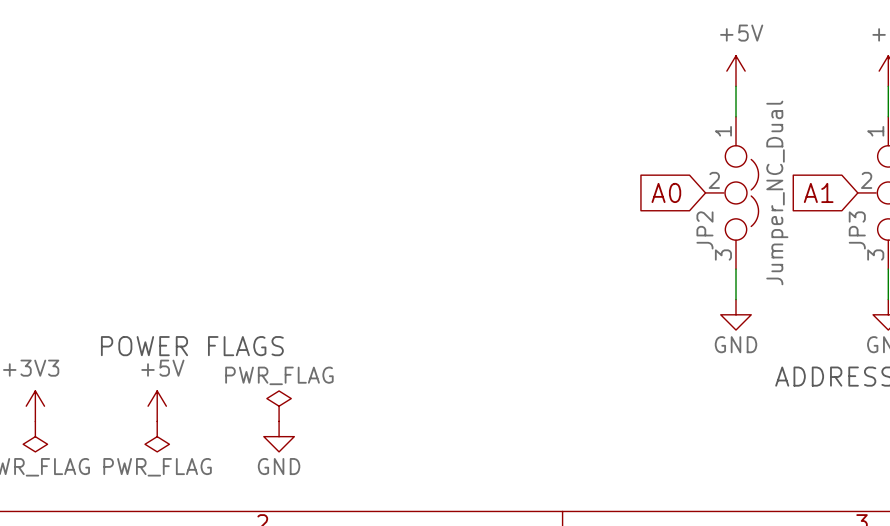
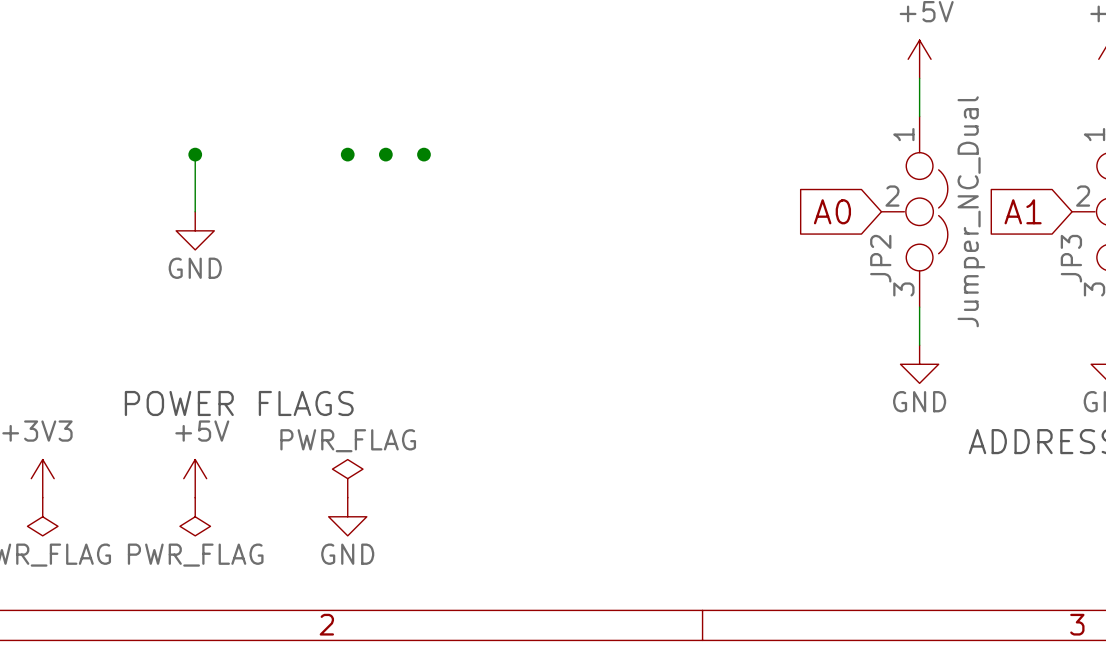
wire: none -> (195, 154) (195, 211)
junction: none -> (195, 154)
junction: none -> (347, 154)
junction: none -> (385, 154)
junction: none -> (423, 154)
power symbol: none -> GND (195, 230)

